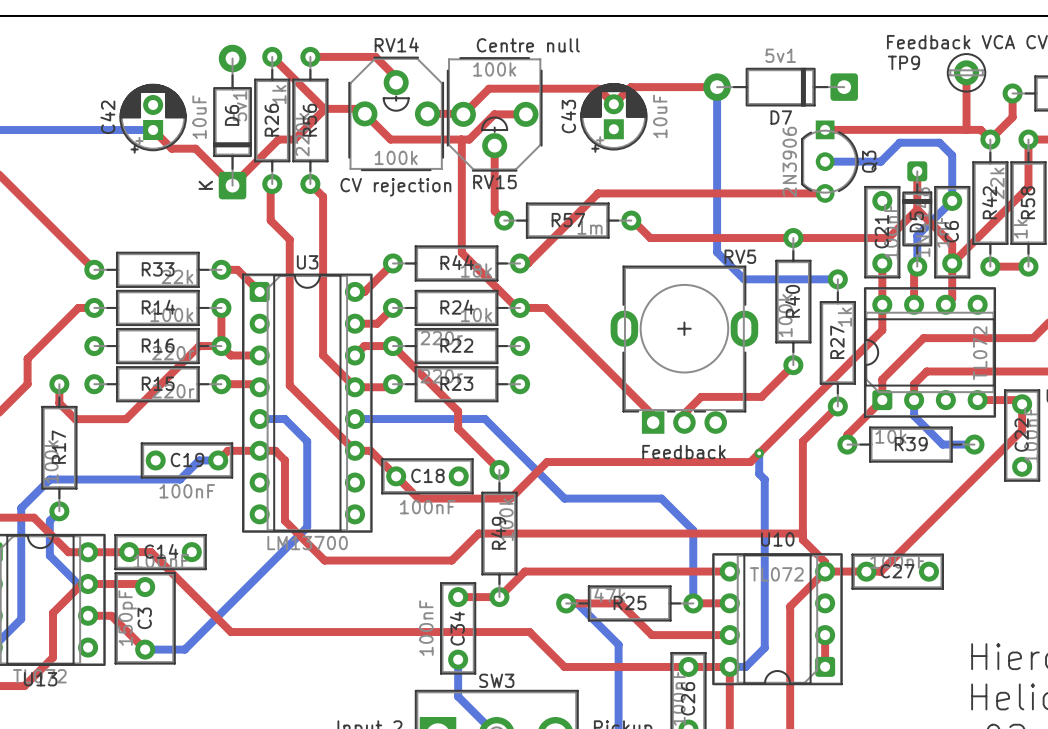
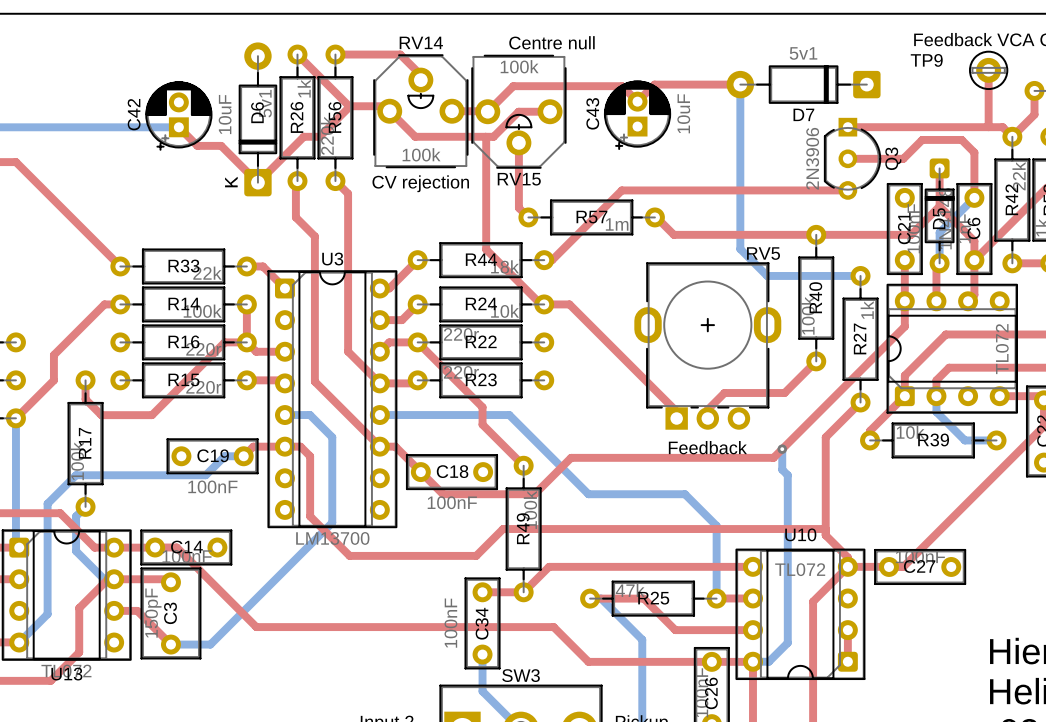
top track: none -> (847, 158) (903, 158) (922, 139) (961, 139) (974, 152) (974, 197)
bottom track: (825, 161) (880, 161) (899, 142) (939, 142) (952, 155) (952, 200) -> none

